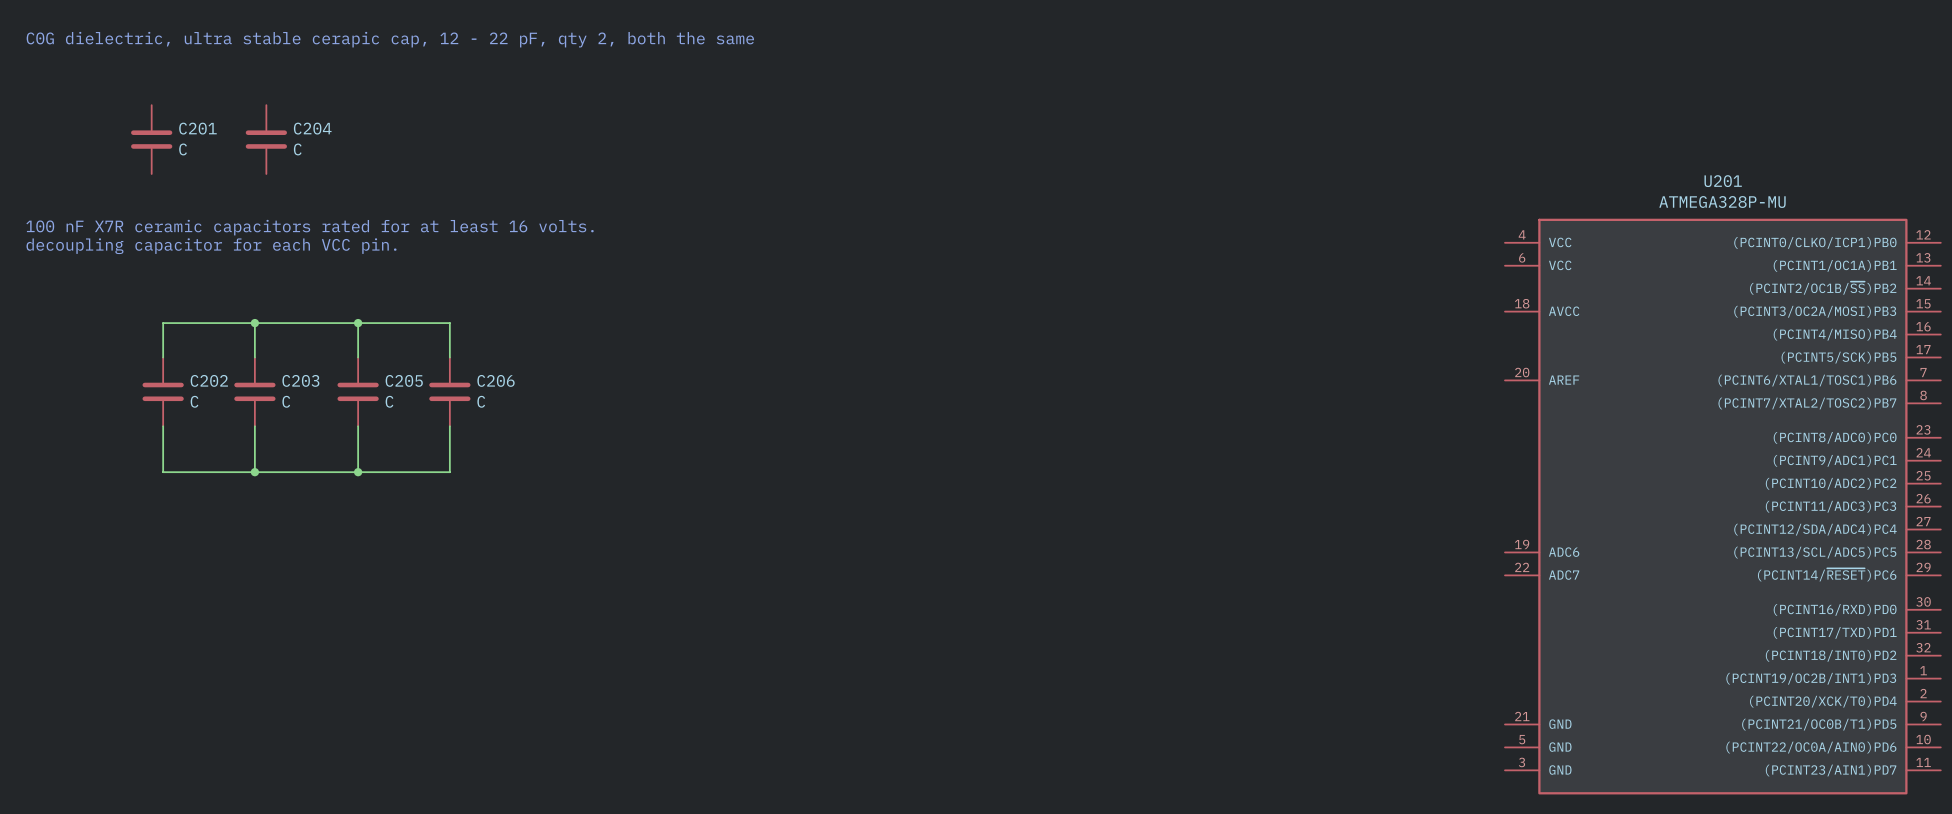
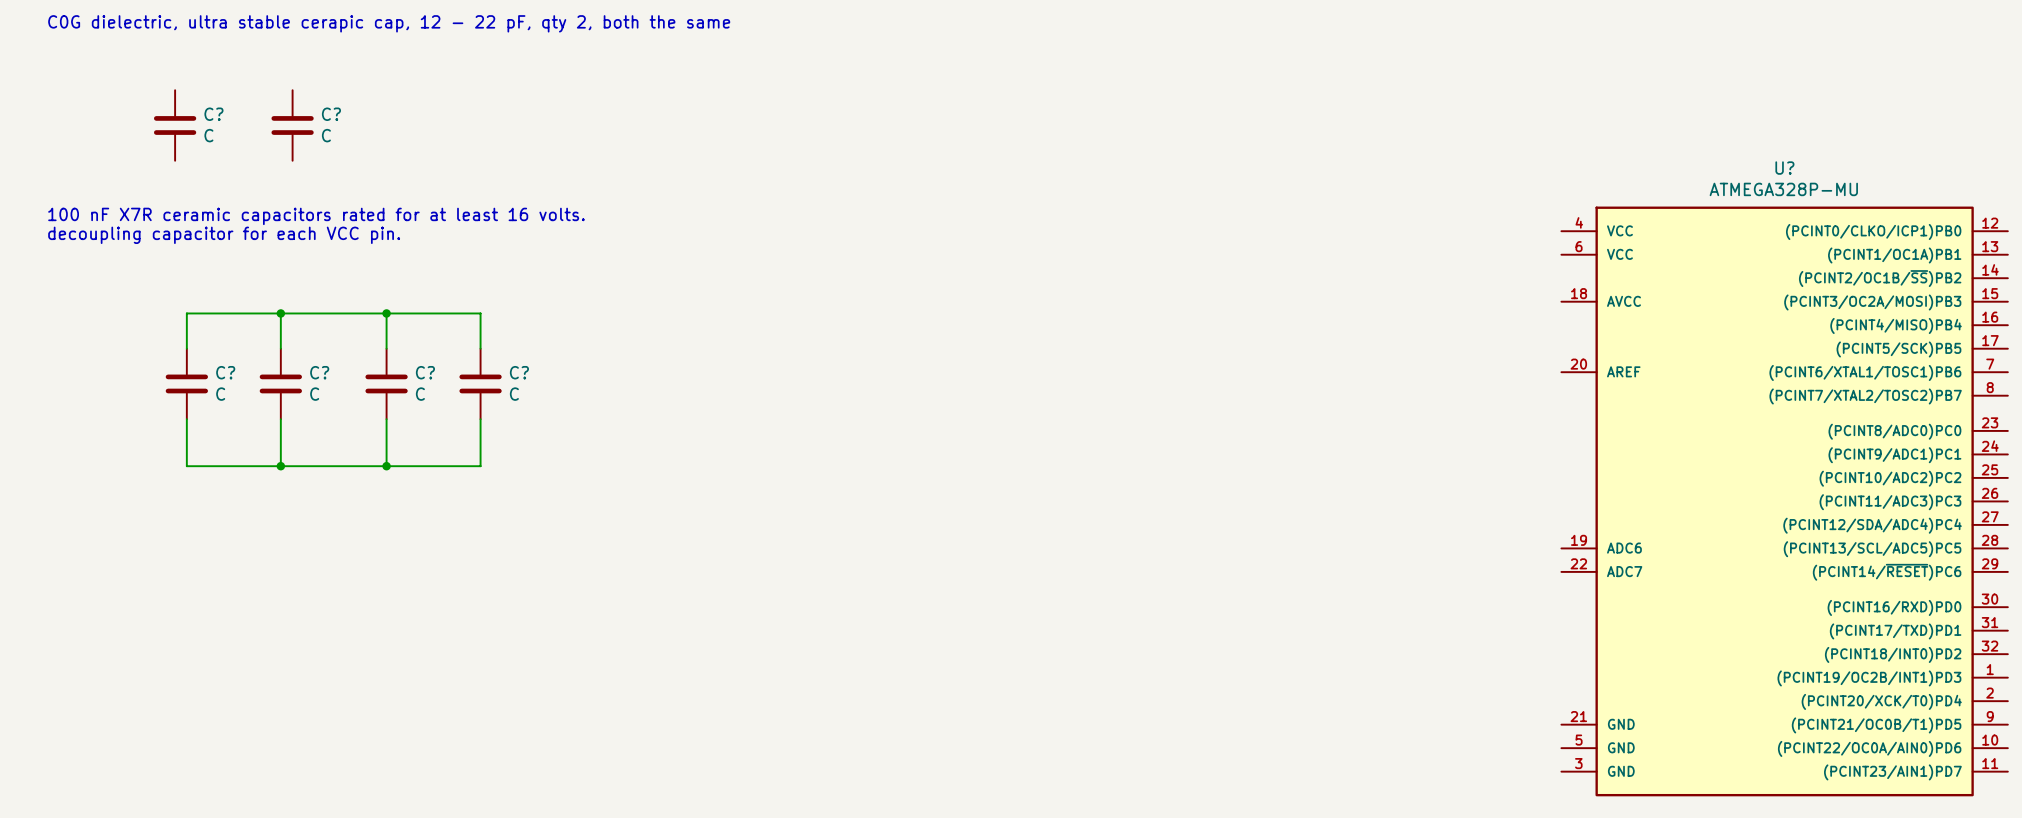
C201 name: C201 (197, 128) -> C? (213, 114)
C204 name: C204 (312, 128) -> C? (331, 114)
U201 name: U201 (1723, 181) -> U? (1784, 168)
C202 name: C202 (209, 380) -> C? (225, 372)
C203 name: C203 (300, 380) -> C? (319, 372)
C205 name: C205 (404, 380) -> C? (425, 372)
C206 name: C206 (496, 380) -> C? (519, 372)

